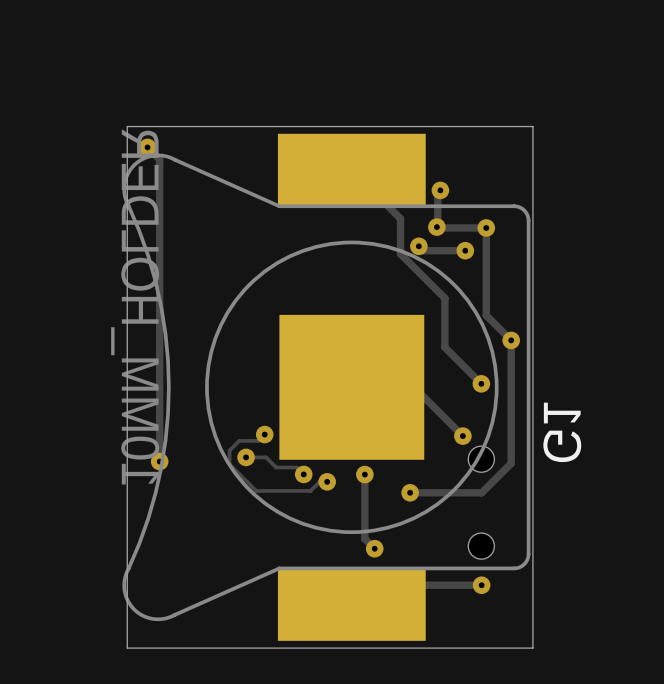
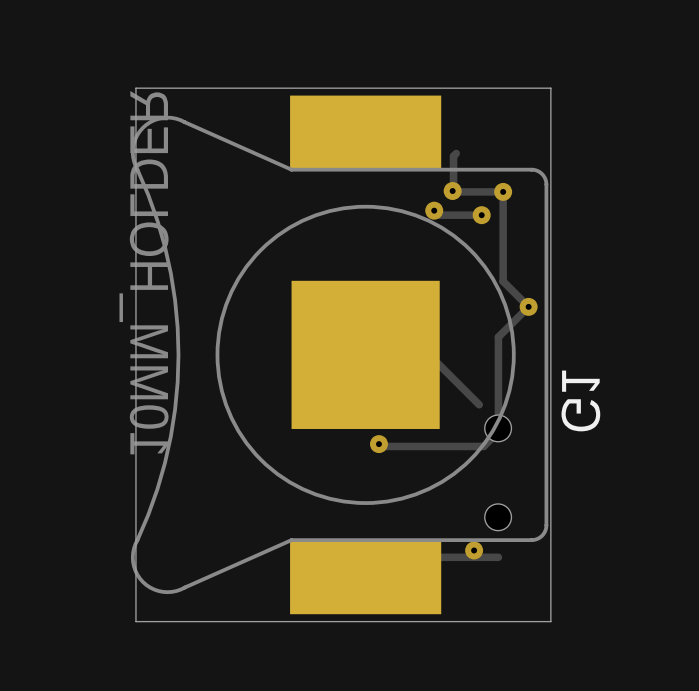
track: (147, 147) (159, 159) (159, 461) -> none
via: (147, 147) -> none
track: (351, 170) (400, 218) (400, 253) (444, 298) (444, 347) (481, 383) -> none
via: (440, 190) -> none
track: (511, 340) (511, 463) (481, 492) (410, 492) -> (528, 306) (498, 337) (498, 431) (483, 446) (381, 446)
via: (481, 383) -> none
track: (264, 434) (258, 440) (239, 440) (229, 450) (229, 464) (256, 490) (310, 490) (319, 481) (327, 481) -> none
via: (264, 434) -> none
via: (462, 436) -> none
track: (246, 457) (266, 457) (276, 467) (296, 467) (303, 474) -> none
via: (246, 457) -> none
via: (159, 461) -> none
via: (303, 474) -> none
track: (364, 474) (364, 538) (374, 548) -> none
via: (327, 481) -> none
via: (410, 492) -> none
via: (374, 548) -> none
via position: (481, 585) -> (474, 550)

